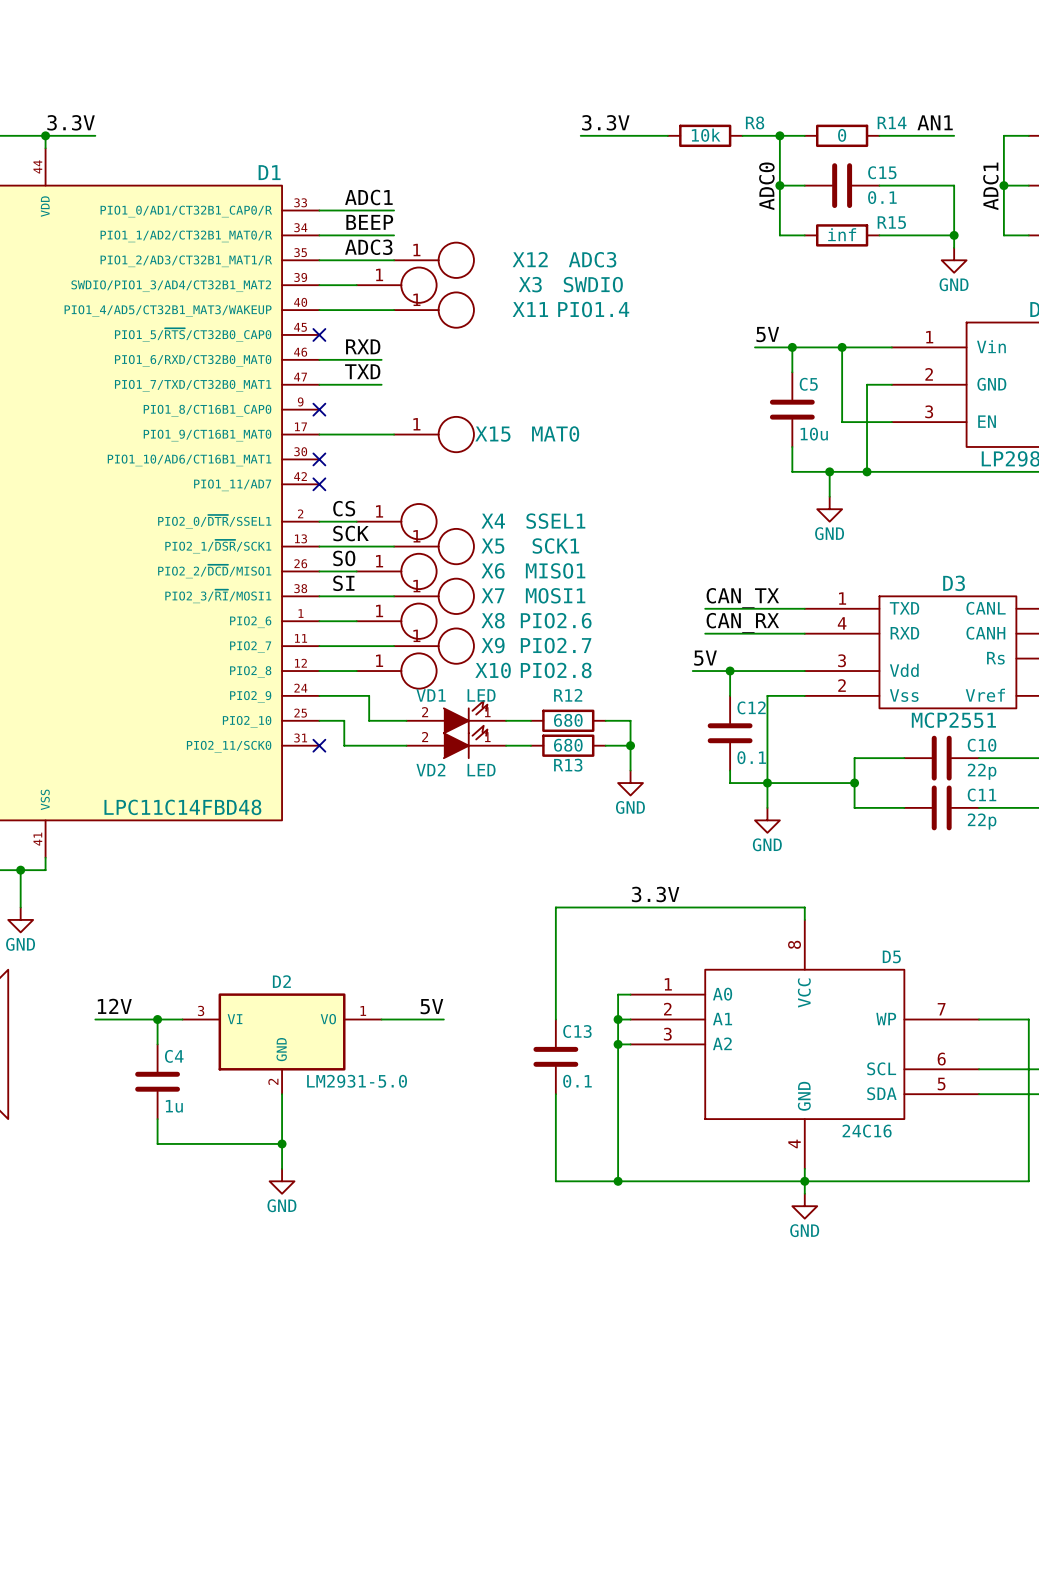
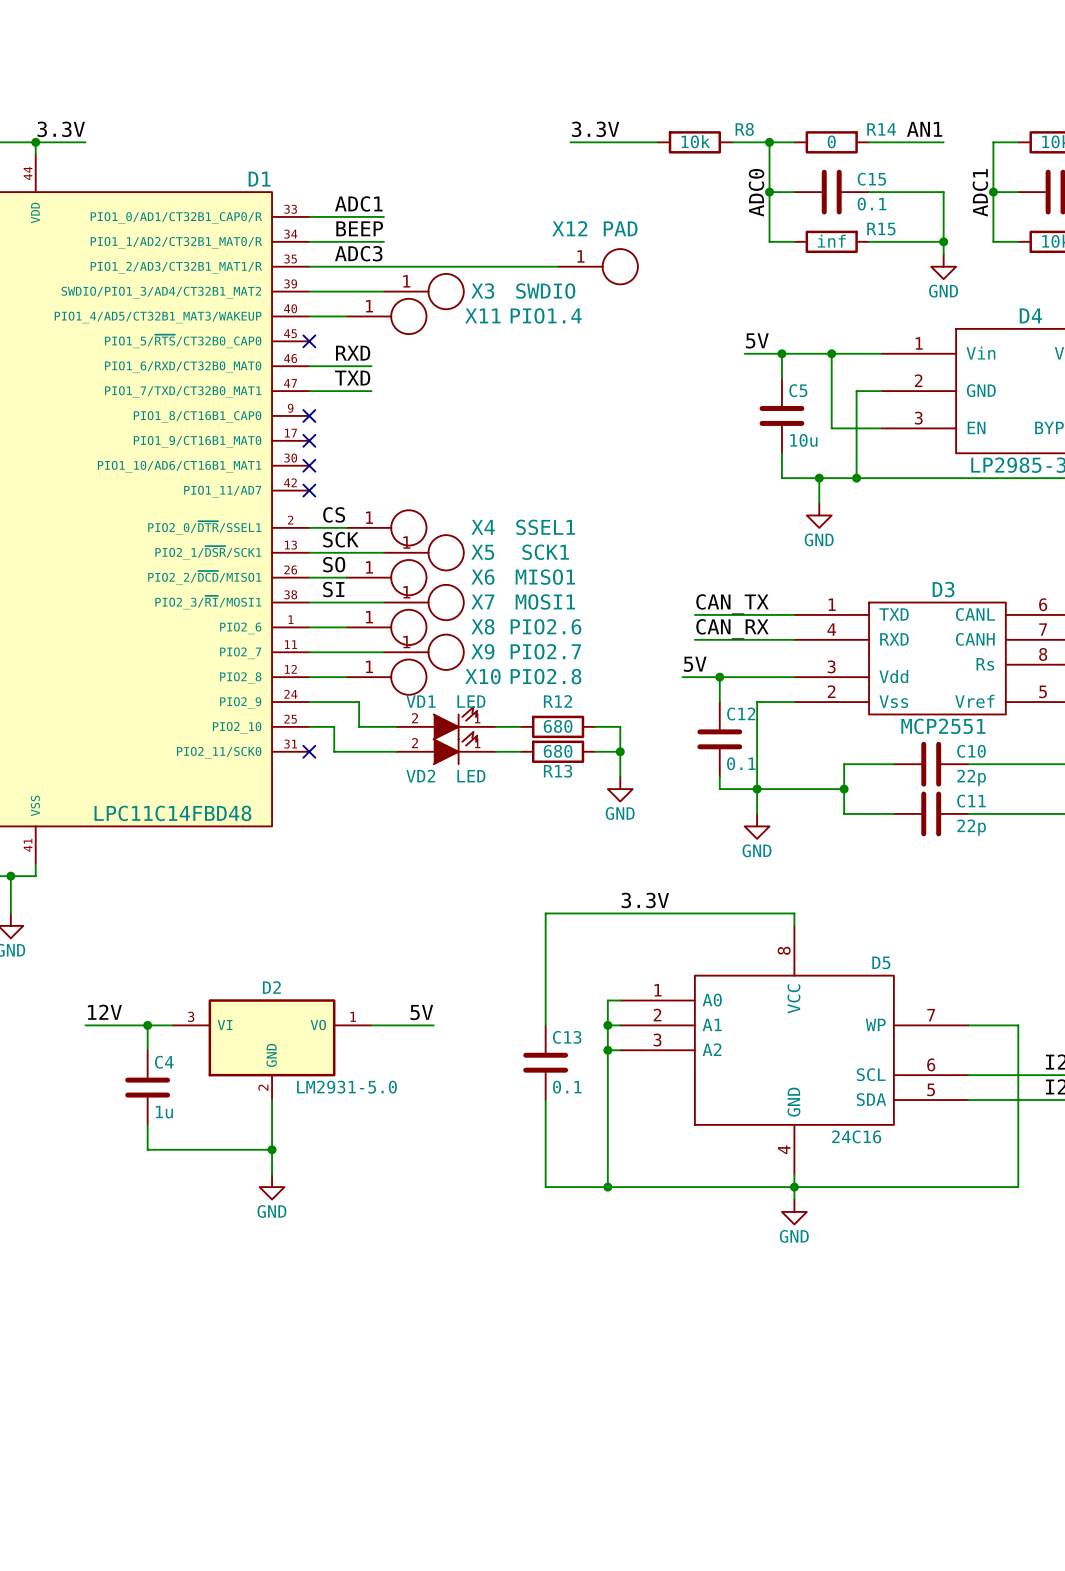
X12 name position: X12 (530, 259) -> X12 (569, 228)
X12 value: ADC3 (592, 259) -> PAD (620, 228)
wire: none -> (383, 266) (558, 266)
X12 position: (434, 260) -> (598, 266)
X3 name position: X3 (530, 284) -> X3 (482, 291)
X3 value position: SWDIO (593, 284) -> SWDIO (545, 291)
X3 position: (396, 285) -> (423, 291)
X11 position: (434, 310) -> (386, 316)
wire: (319, 434) (394, 434) -> none
no-connect mark: none -> (309, 440)
X15: MAT0 (434, 434) -> none

